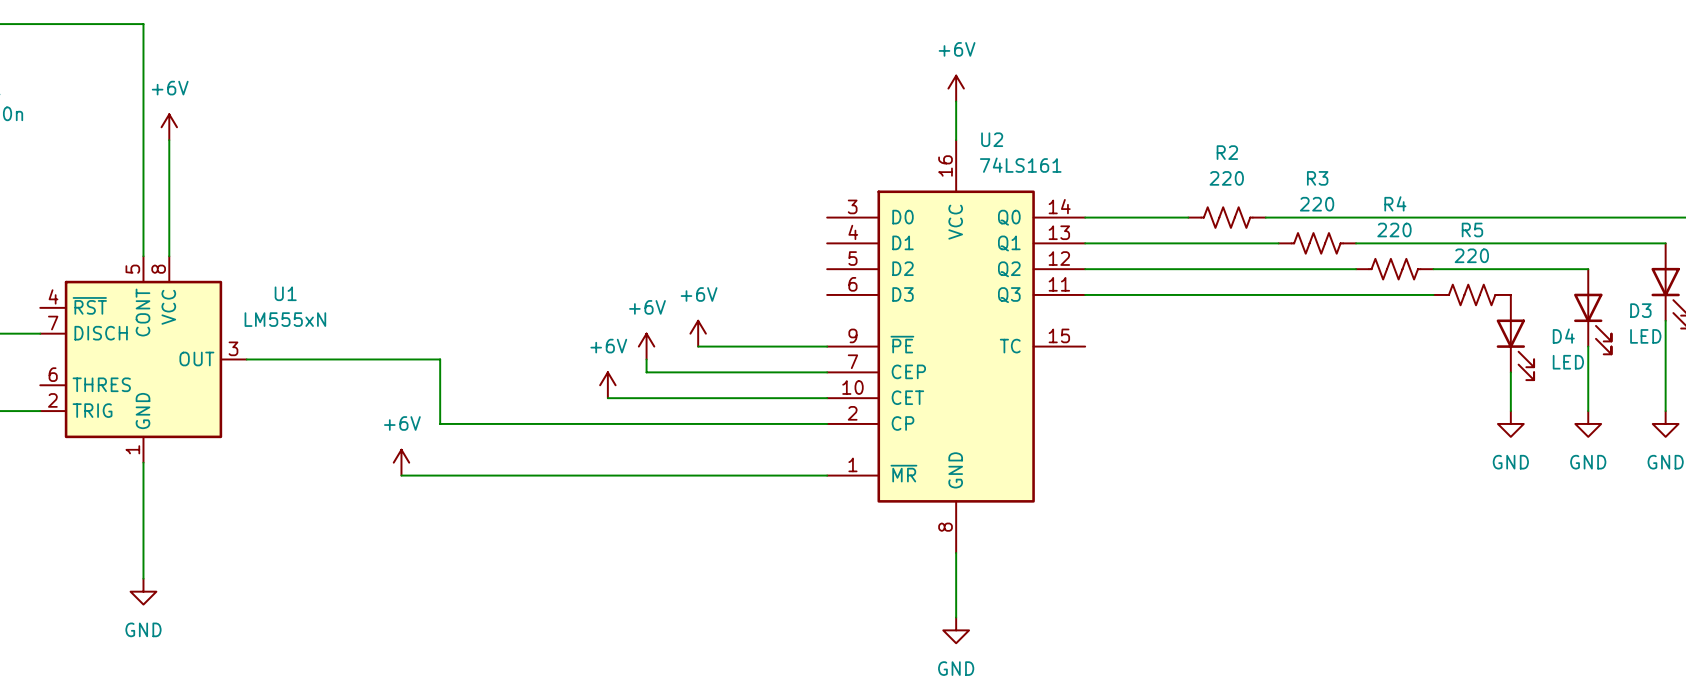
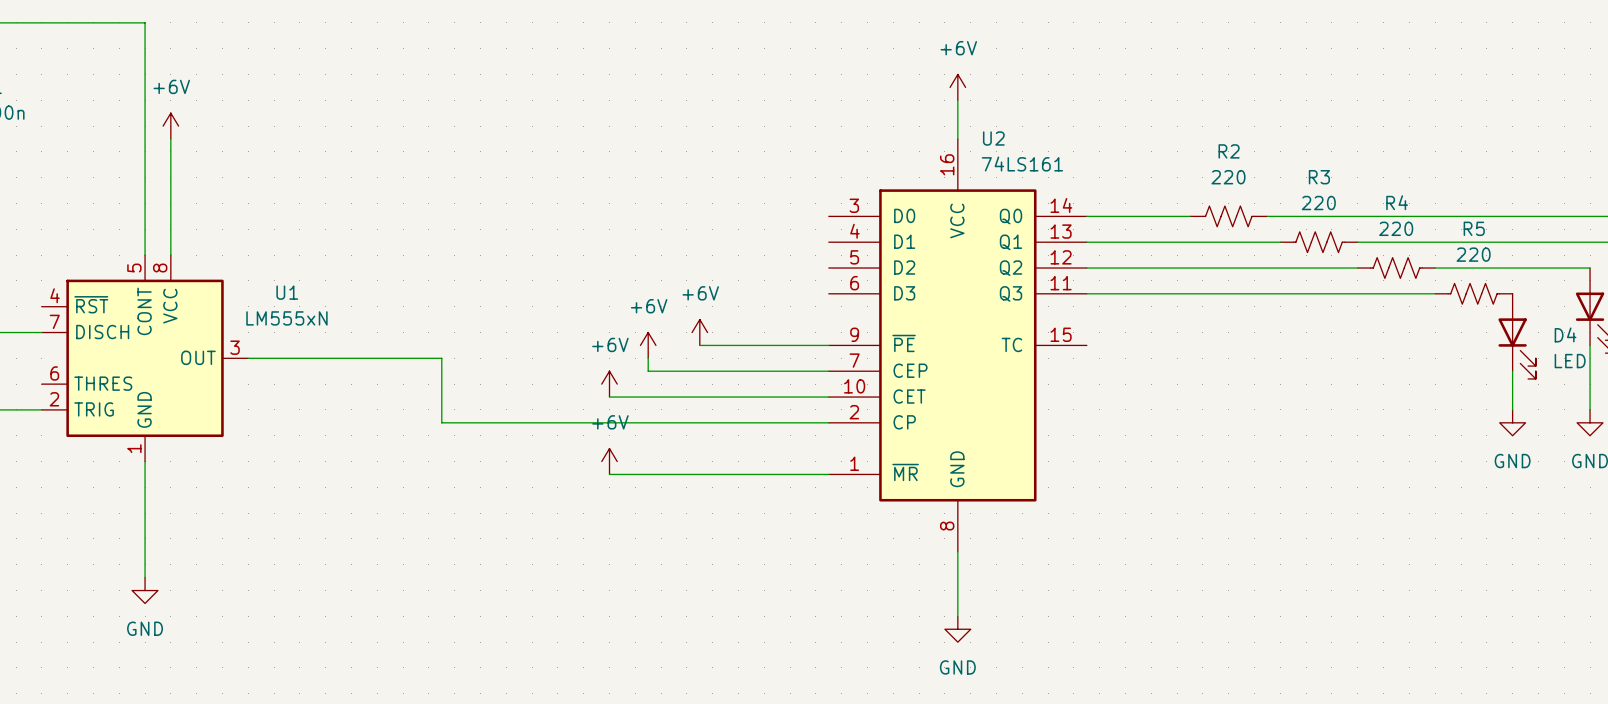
power symbol position: +6V (401, 462) -> +6V (609, 461)
wire: (401, 475) (607, 475) -> none

